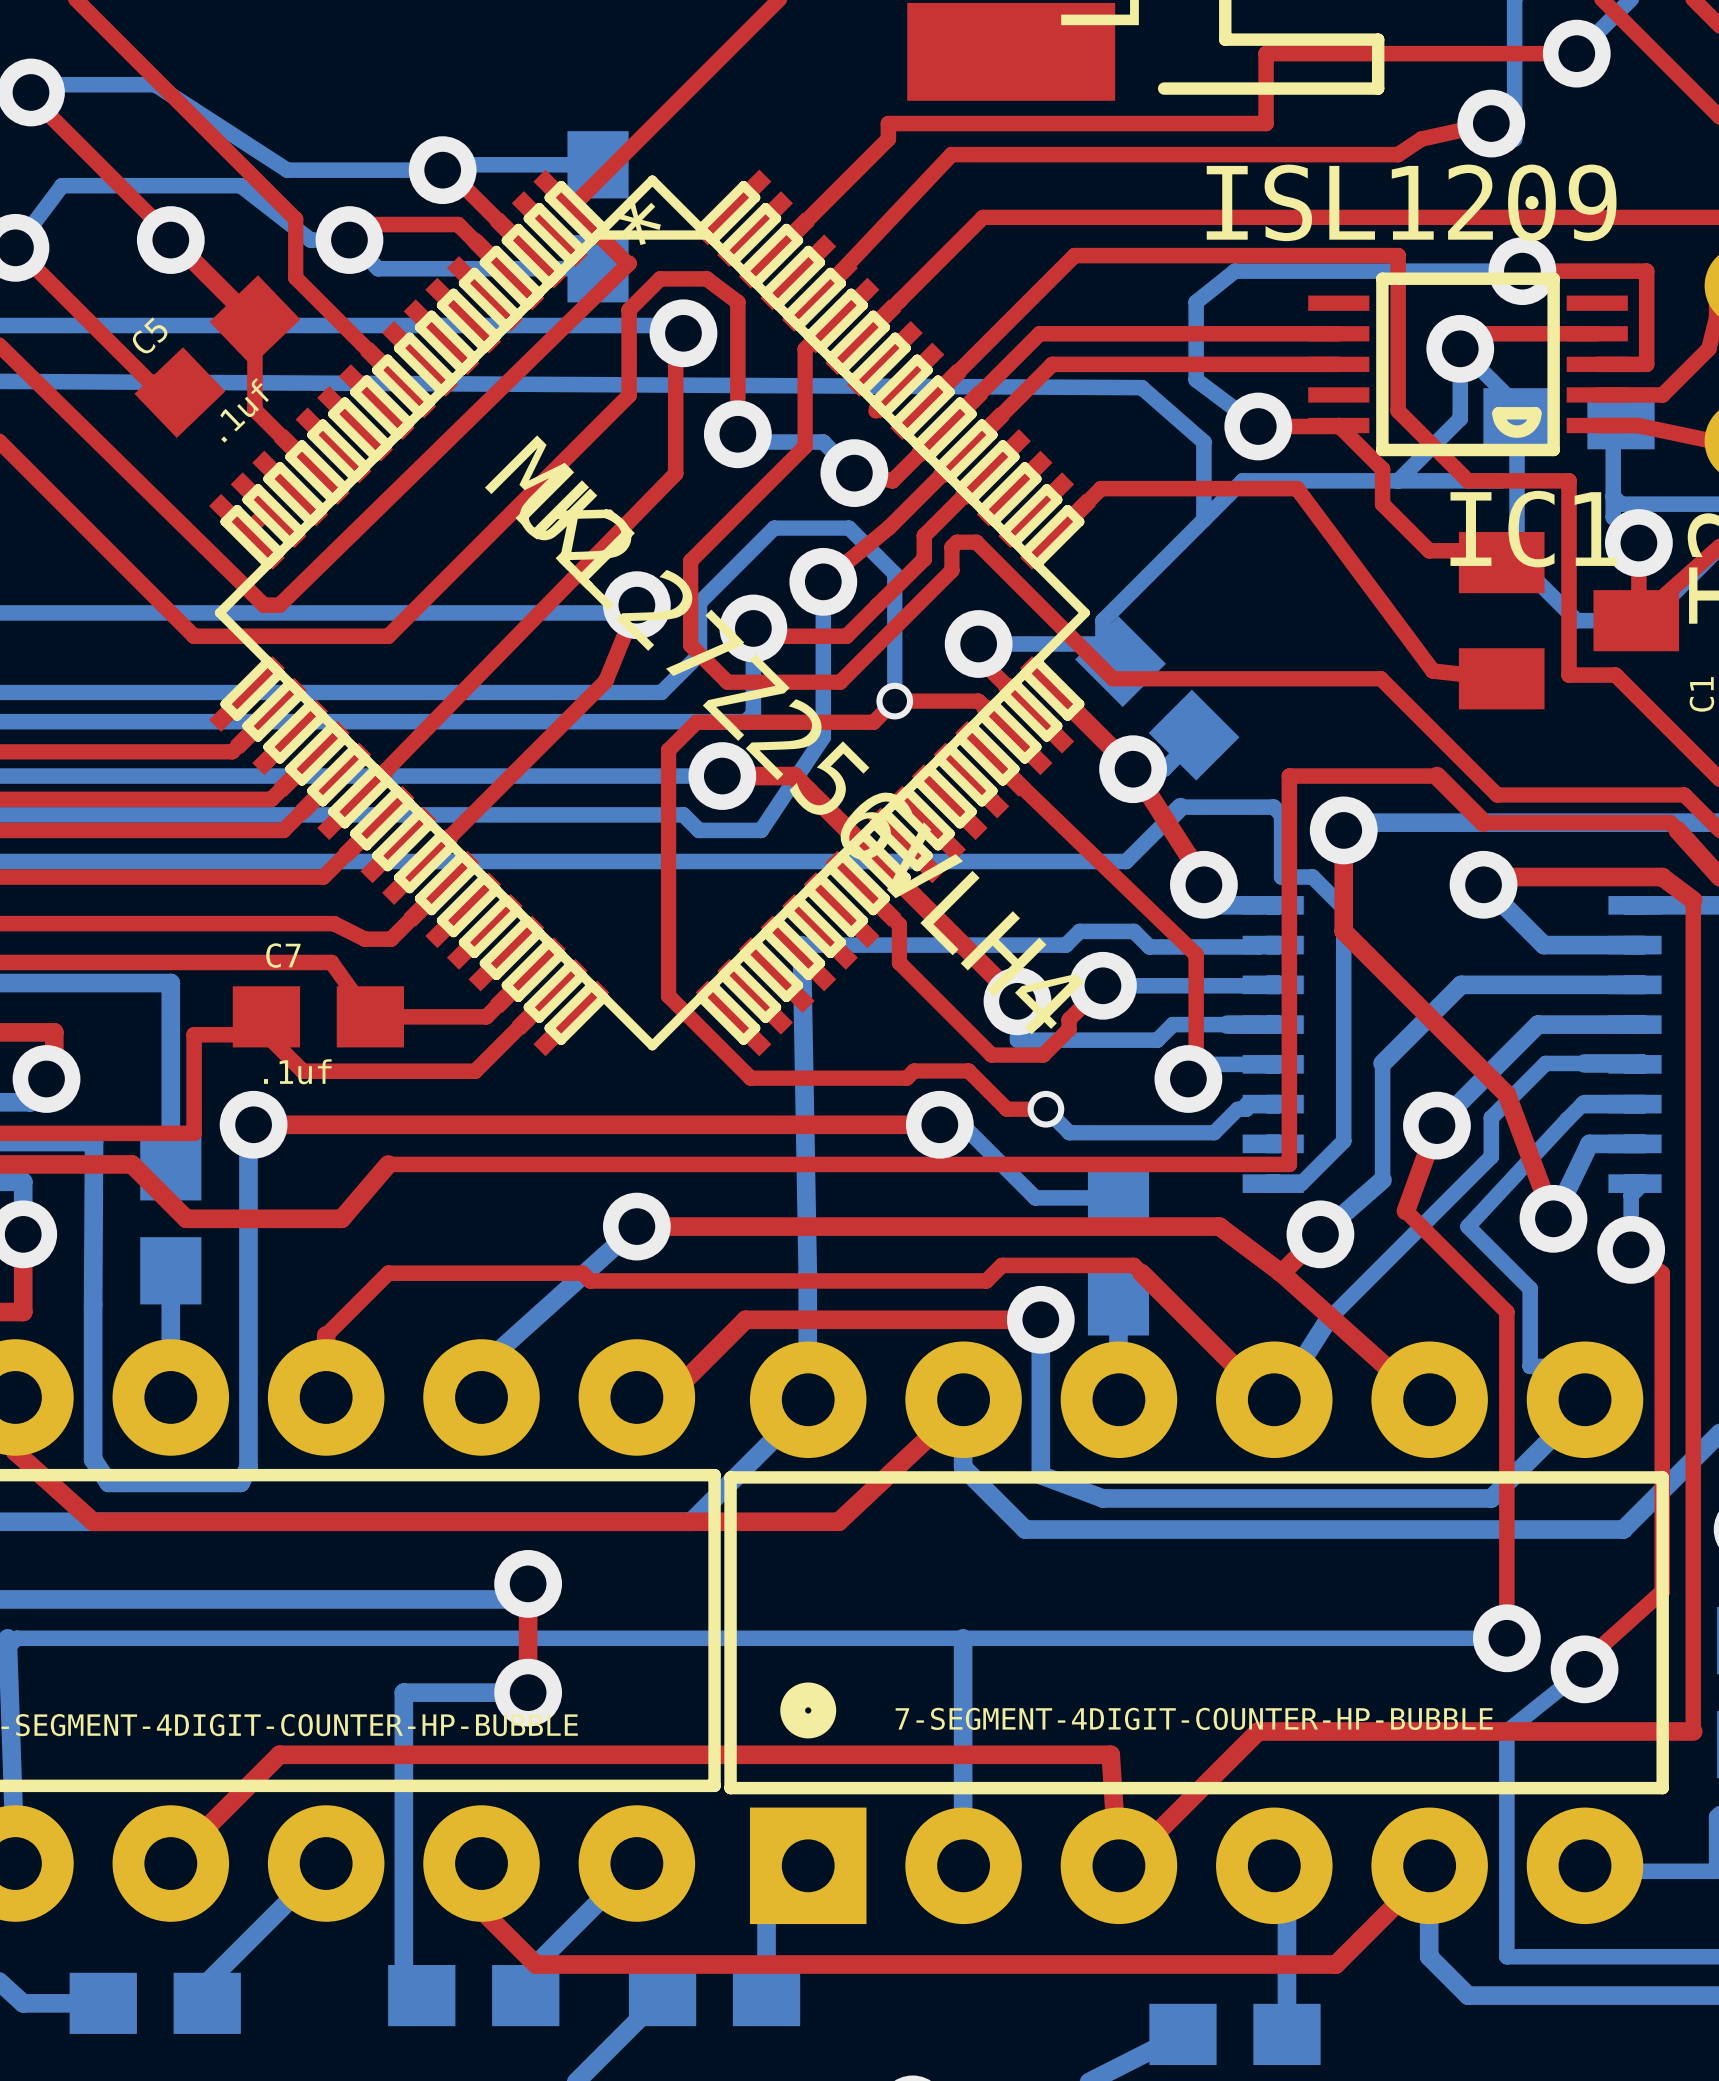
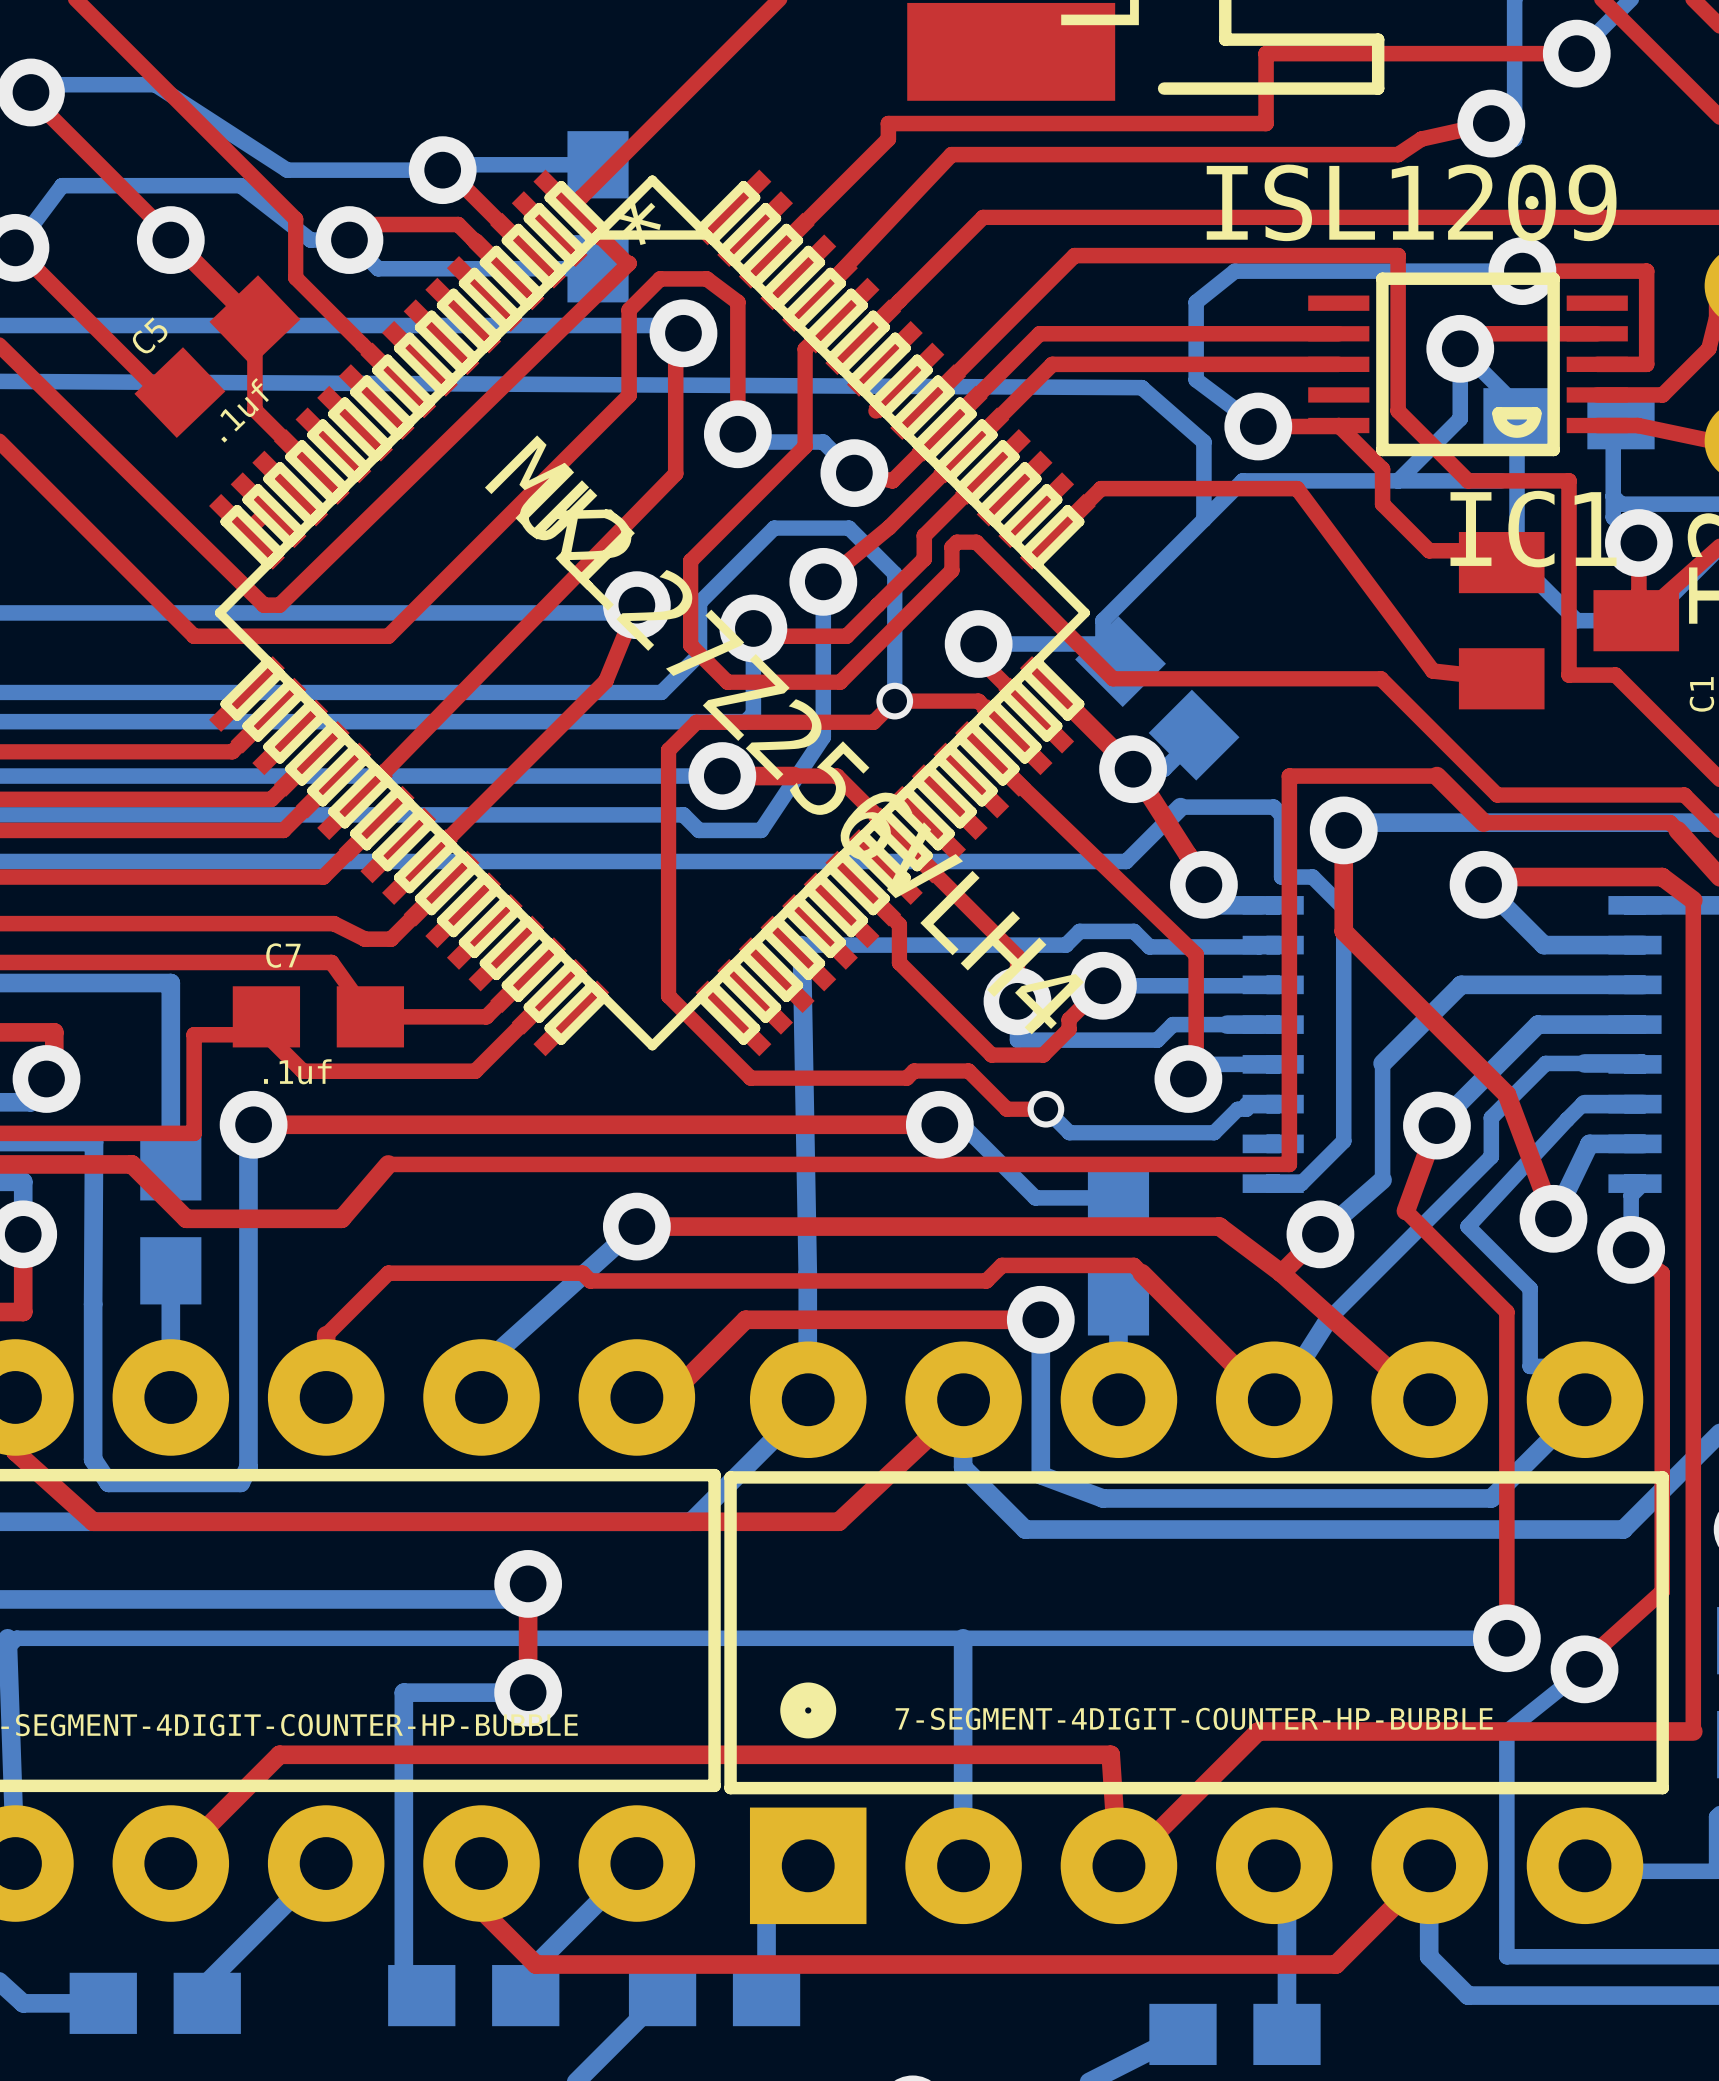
top track: (793, 776) (1019, 1001) -> (793, 776) (837, 776) (1017, 956) (1017, 1001)

